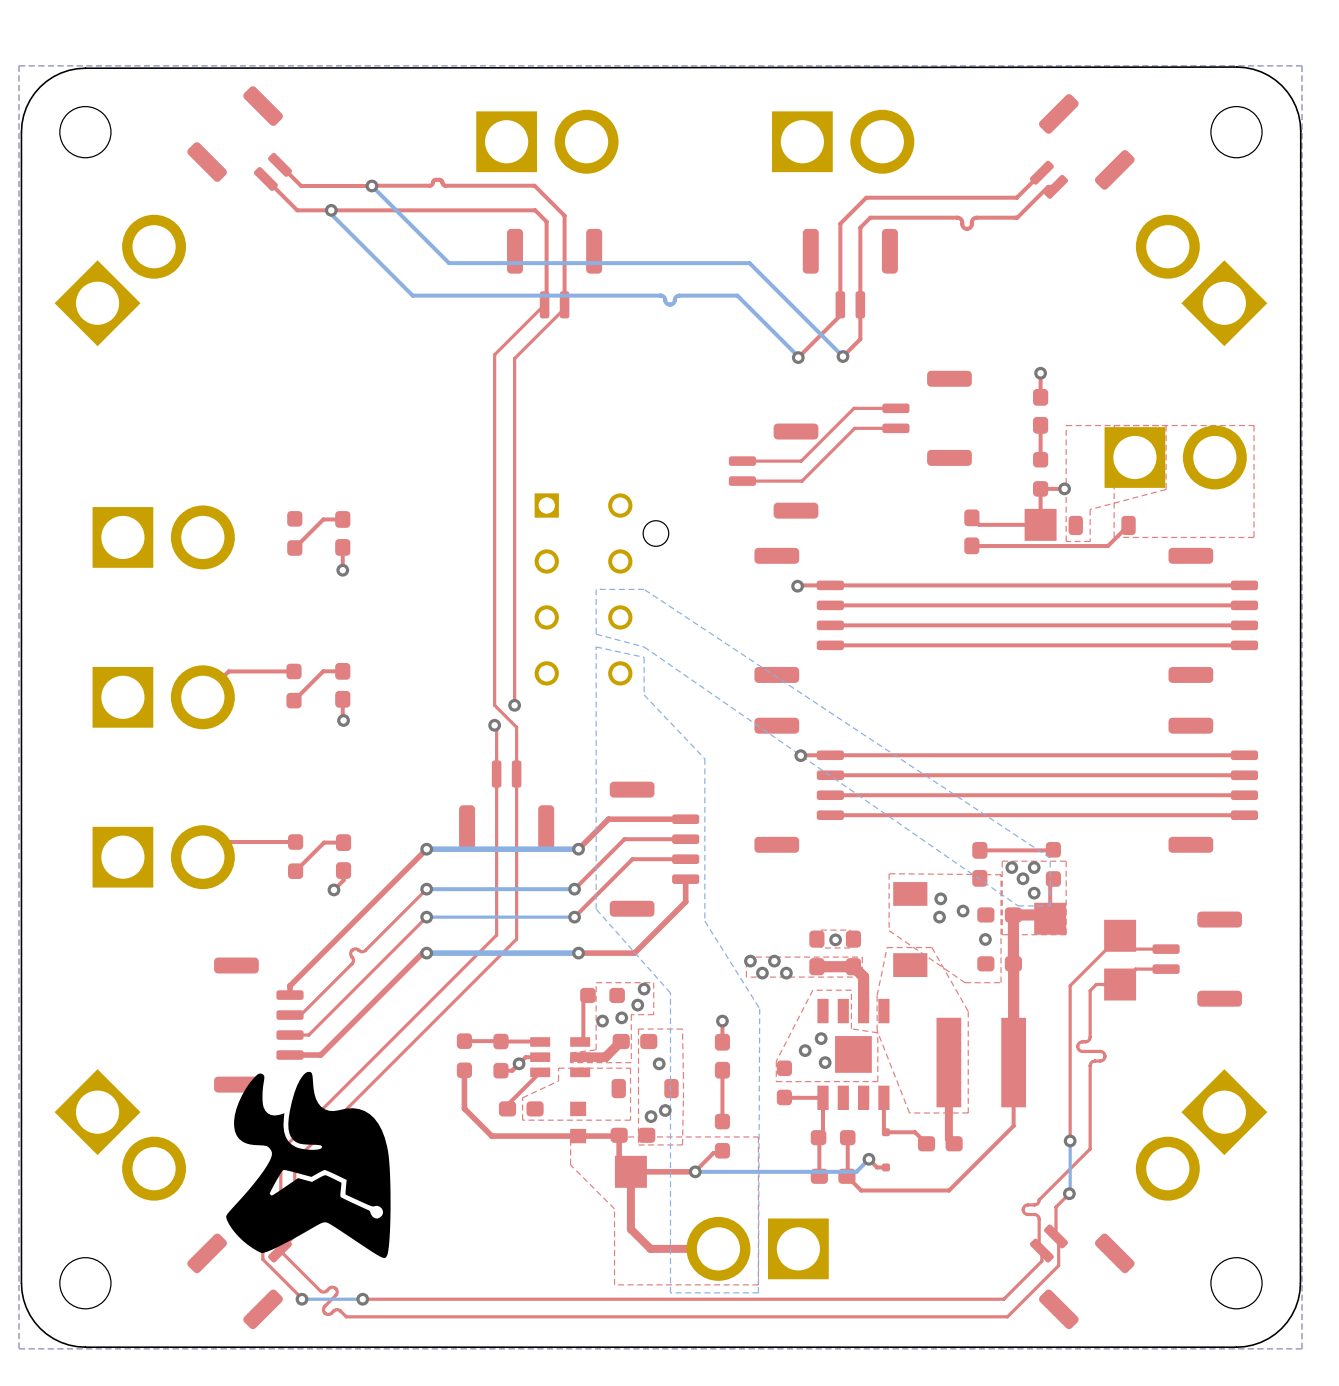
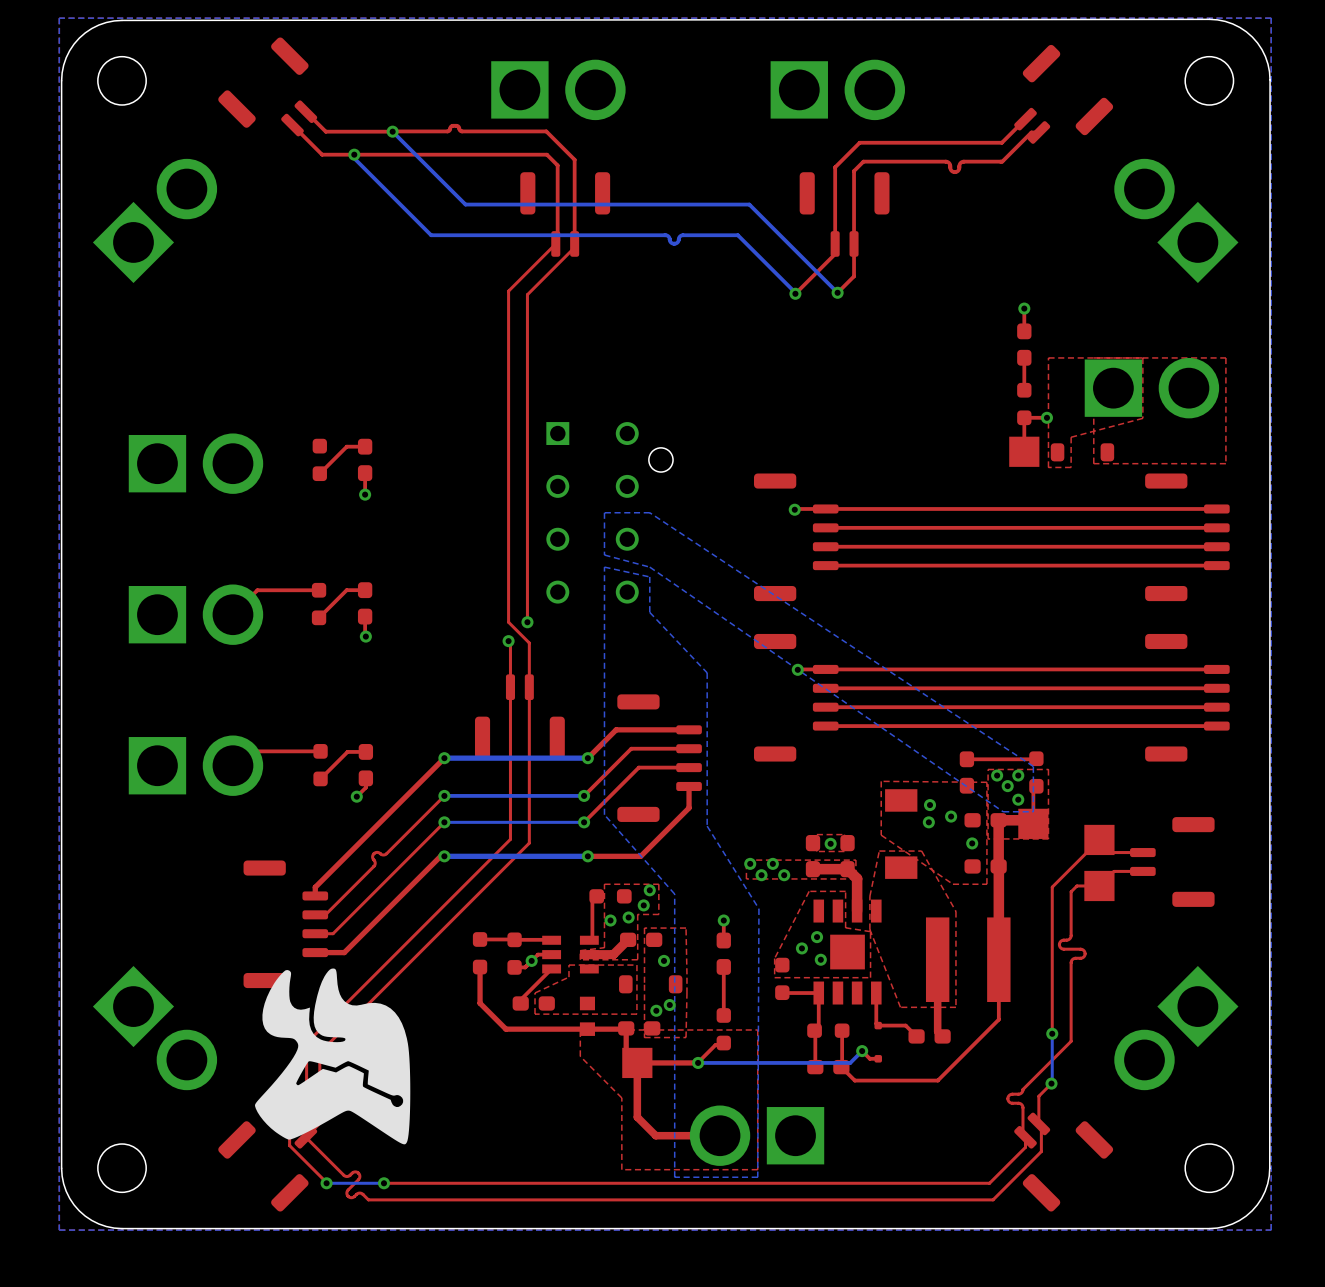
top track: (895, 408) (853, 408) (801, 461) (742, 461) -> none
part: (927, 418) -> none
top track: (895, 428) (854, 428) (801, 481) (742, 481) -> none
part: (773, 471) -> none
top track: (971, 517) (978, 524) (1040, 524) -> none
top track: (1128, 525) (1107, 546) (972, 546) -> none
part: (971, 531) -> none

